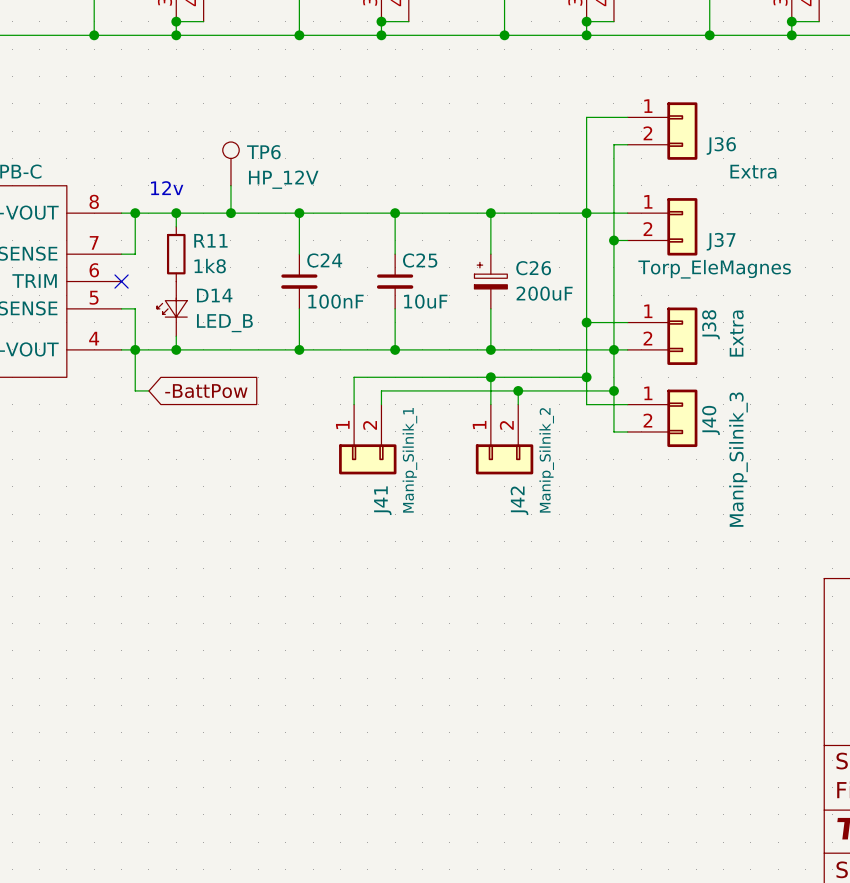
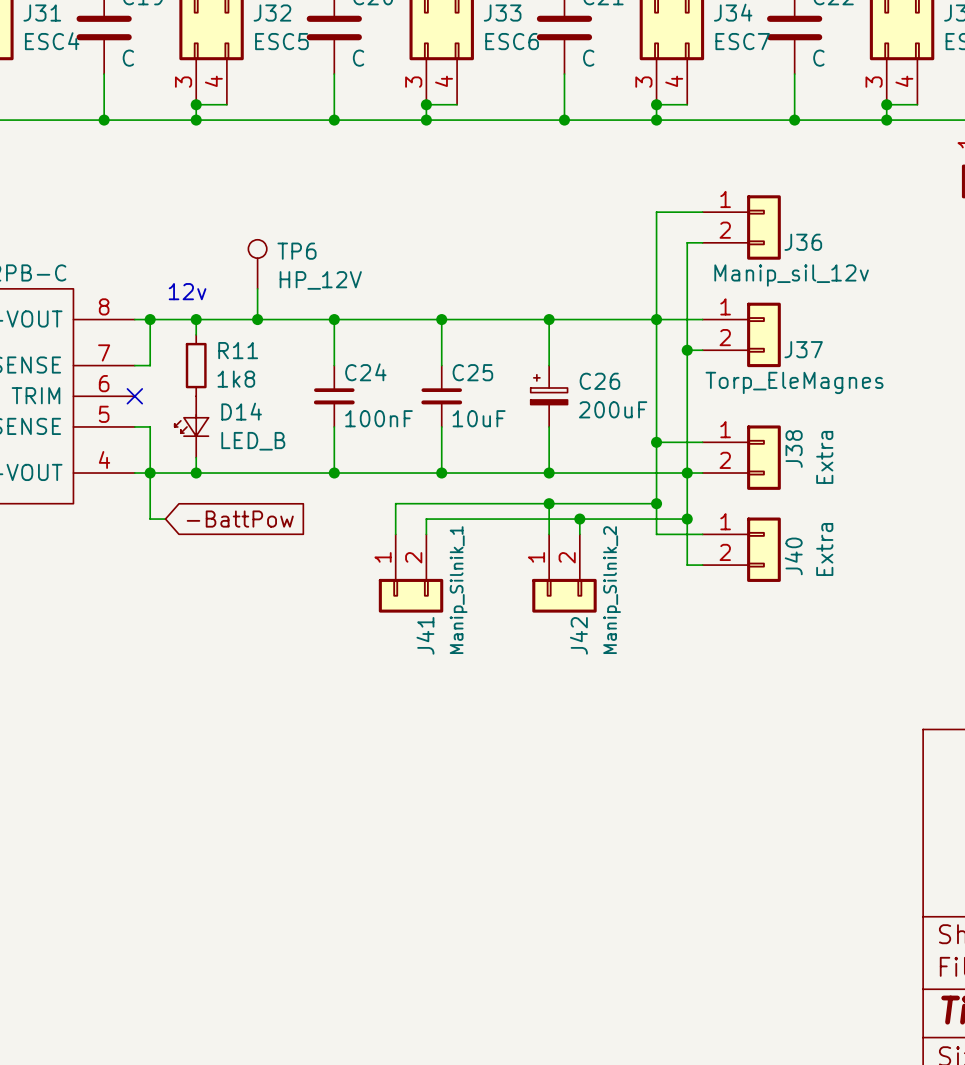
J36 value: Extra (753, 171) -> Manip_sil_12v (791, 275)
J40 value: Manip_Silnik_3 (738, 459) -> Extra (824, 549)

